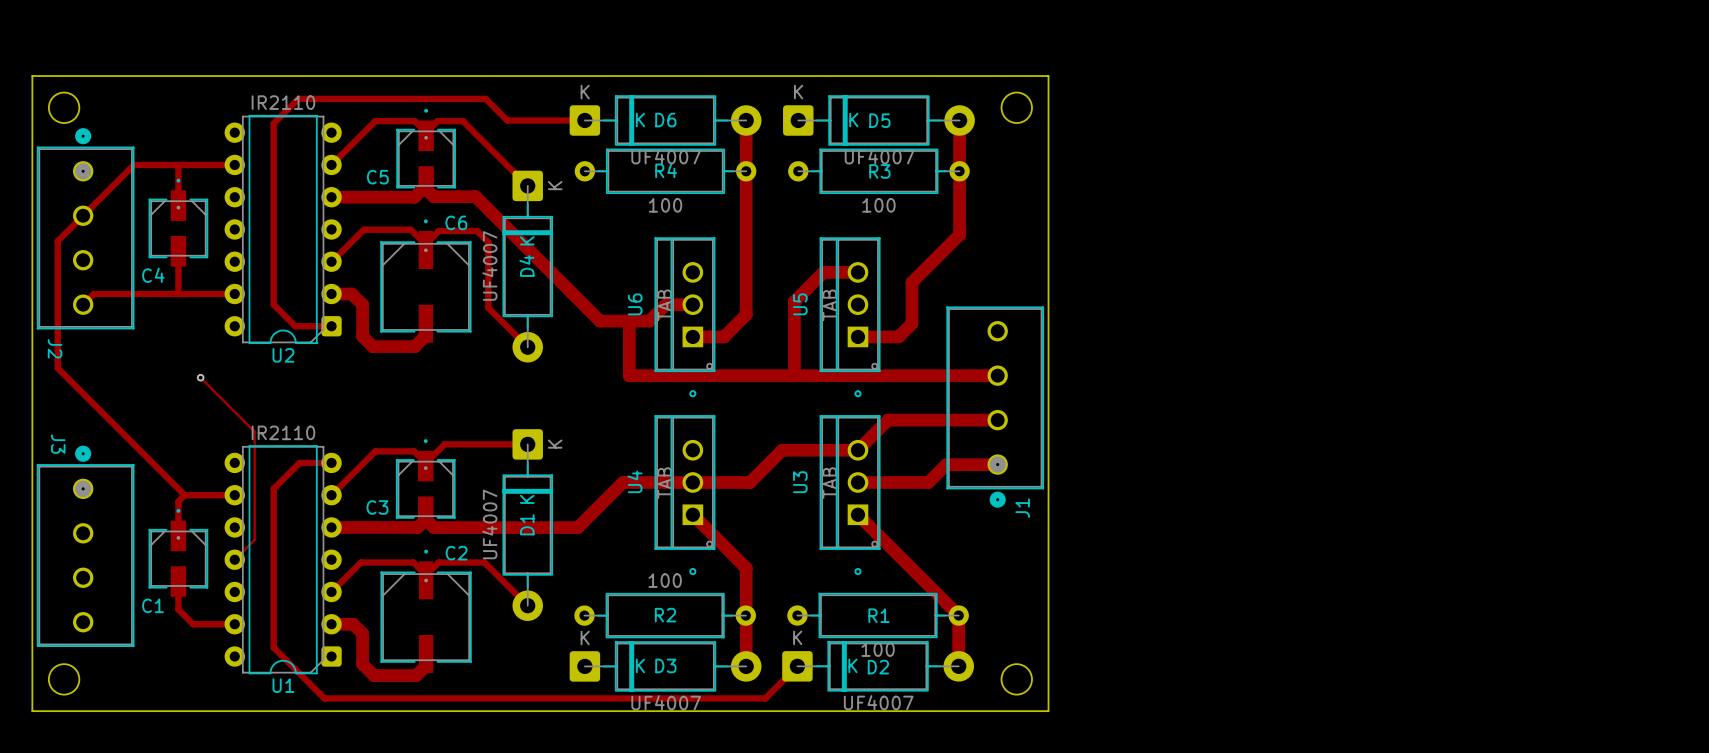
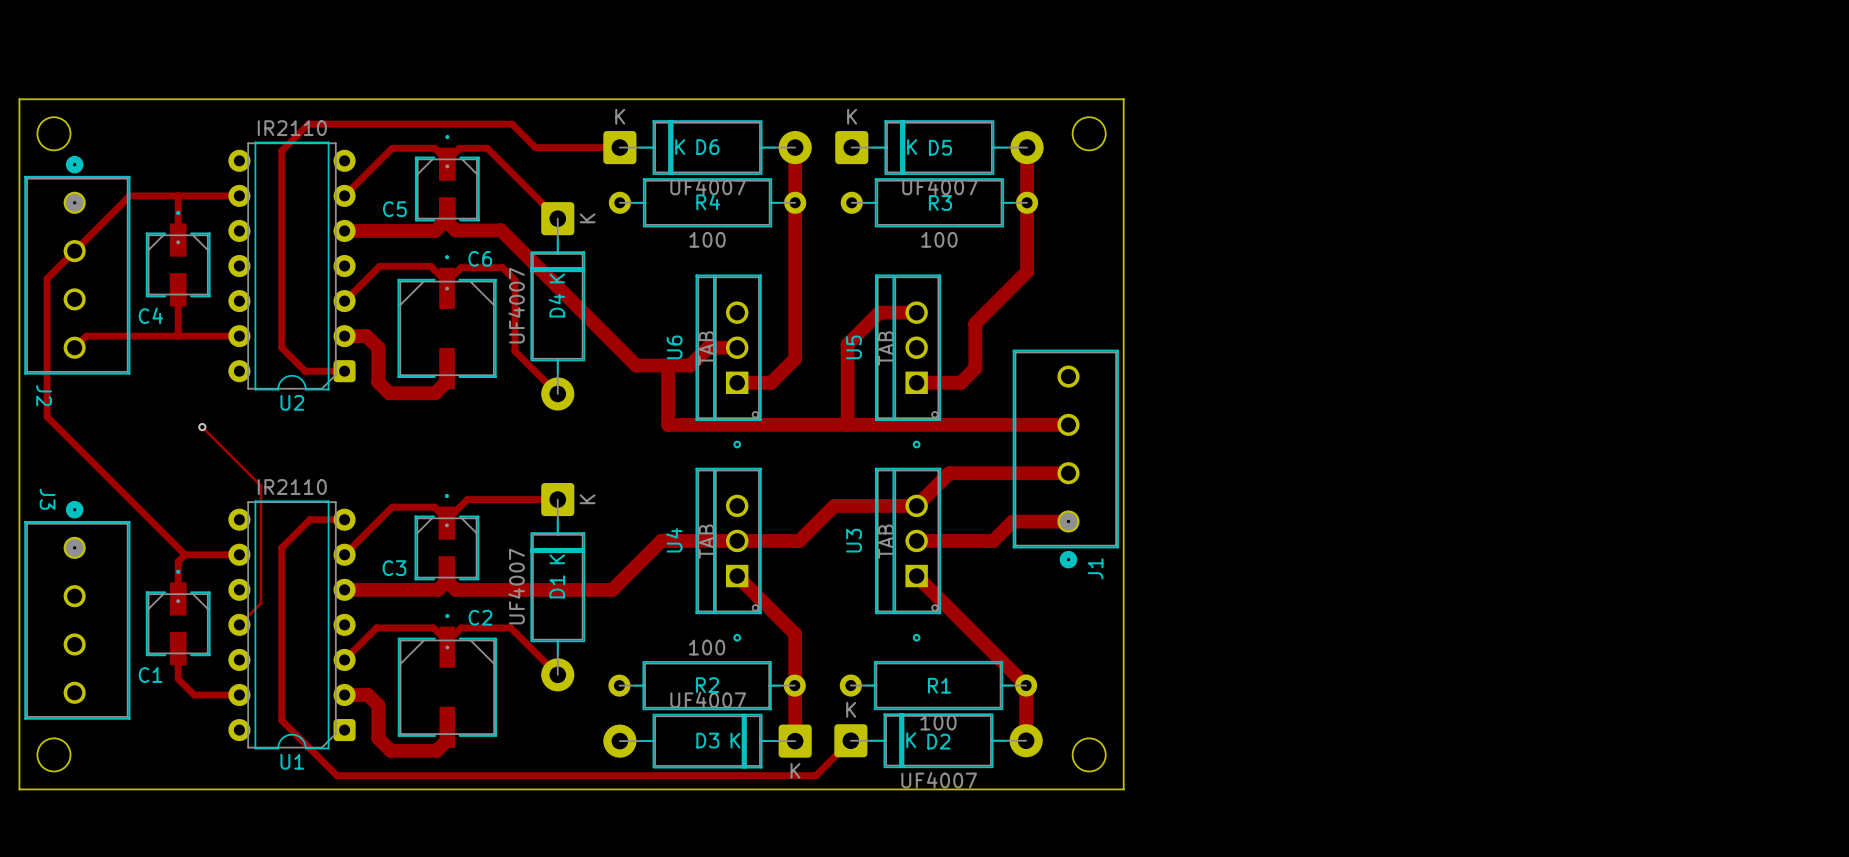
D3 rotation: 0° (665, 666) -> 180° (707, 741)

